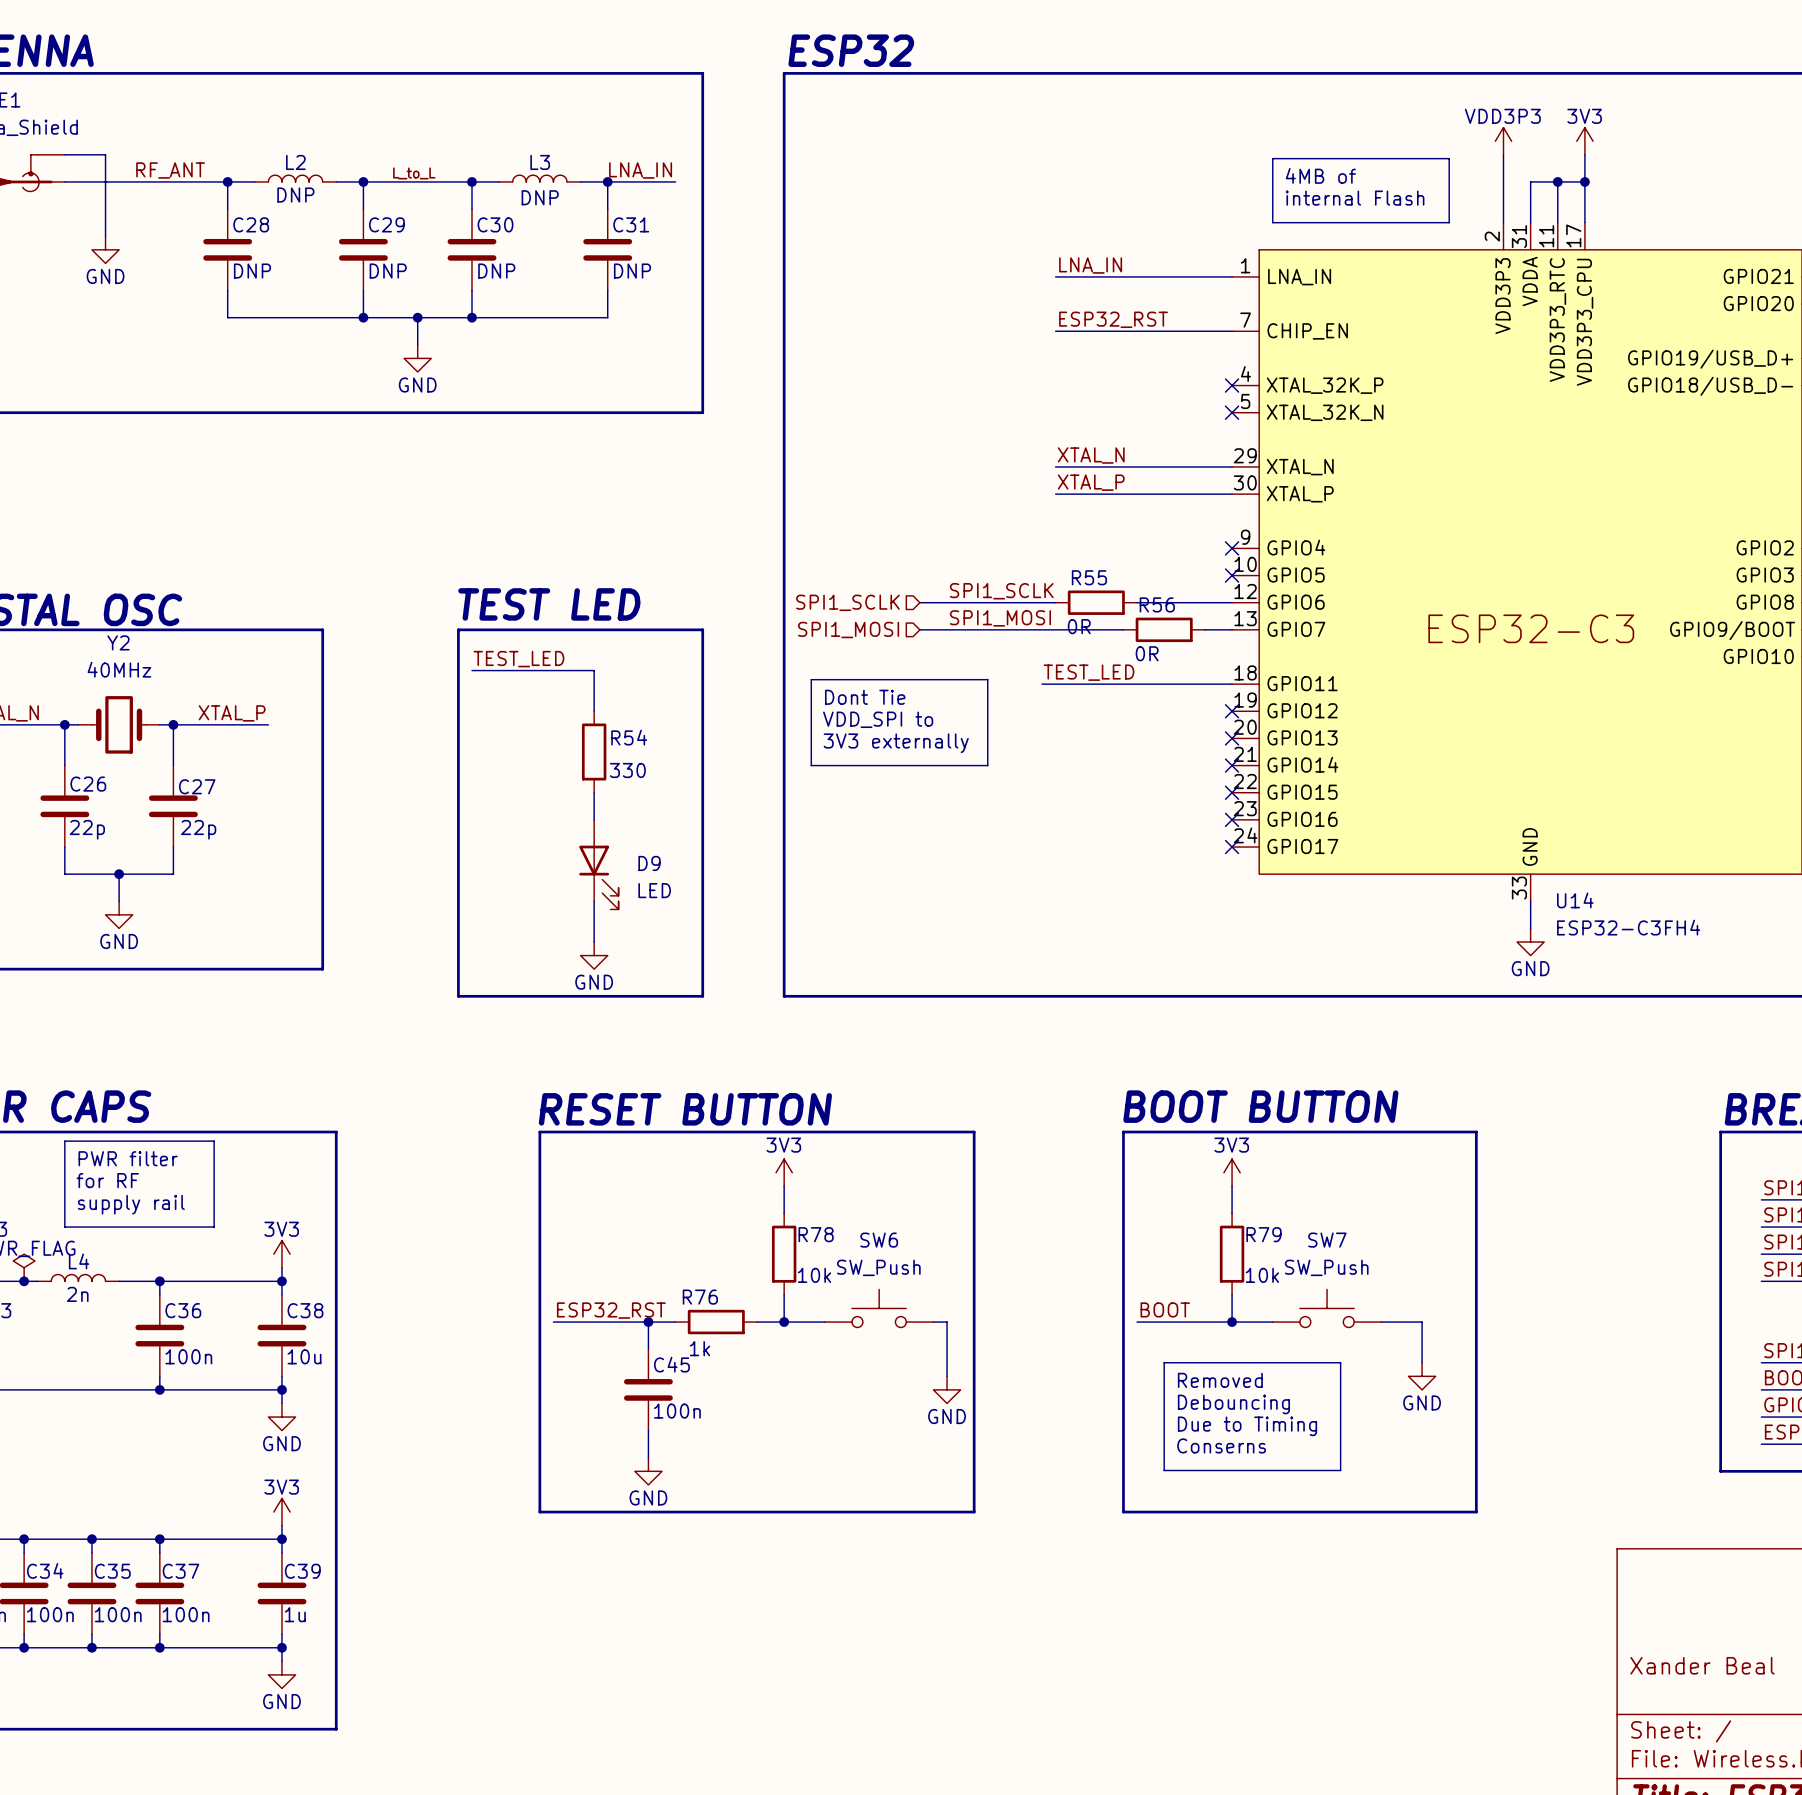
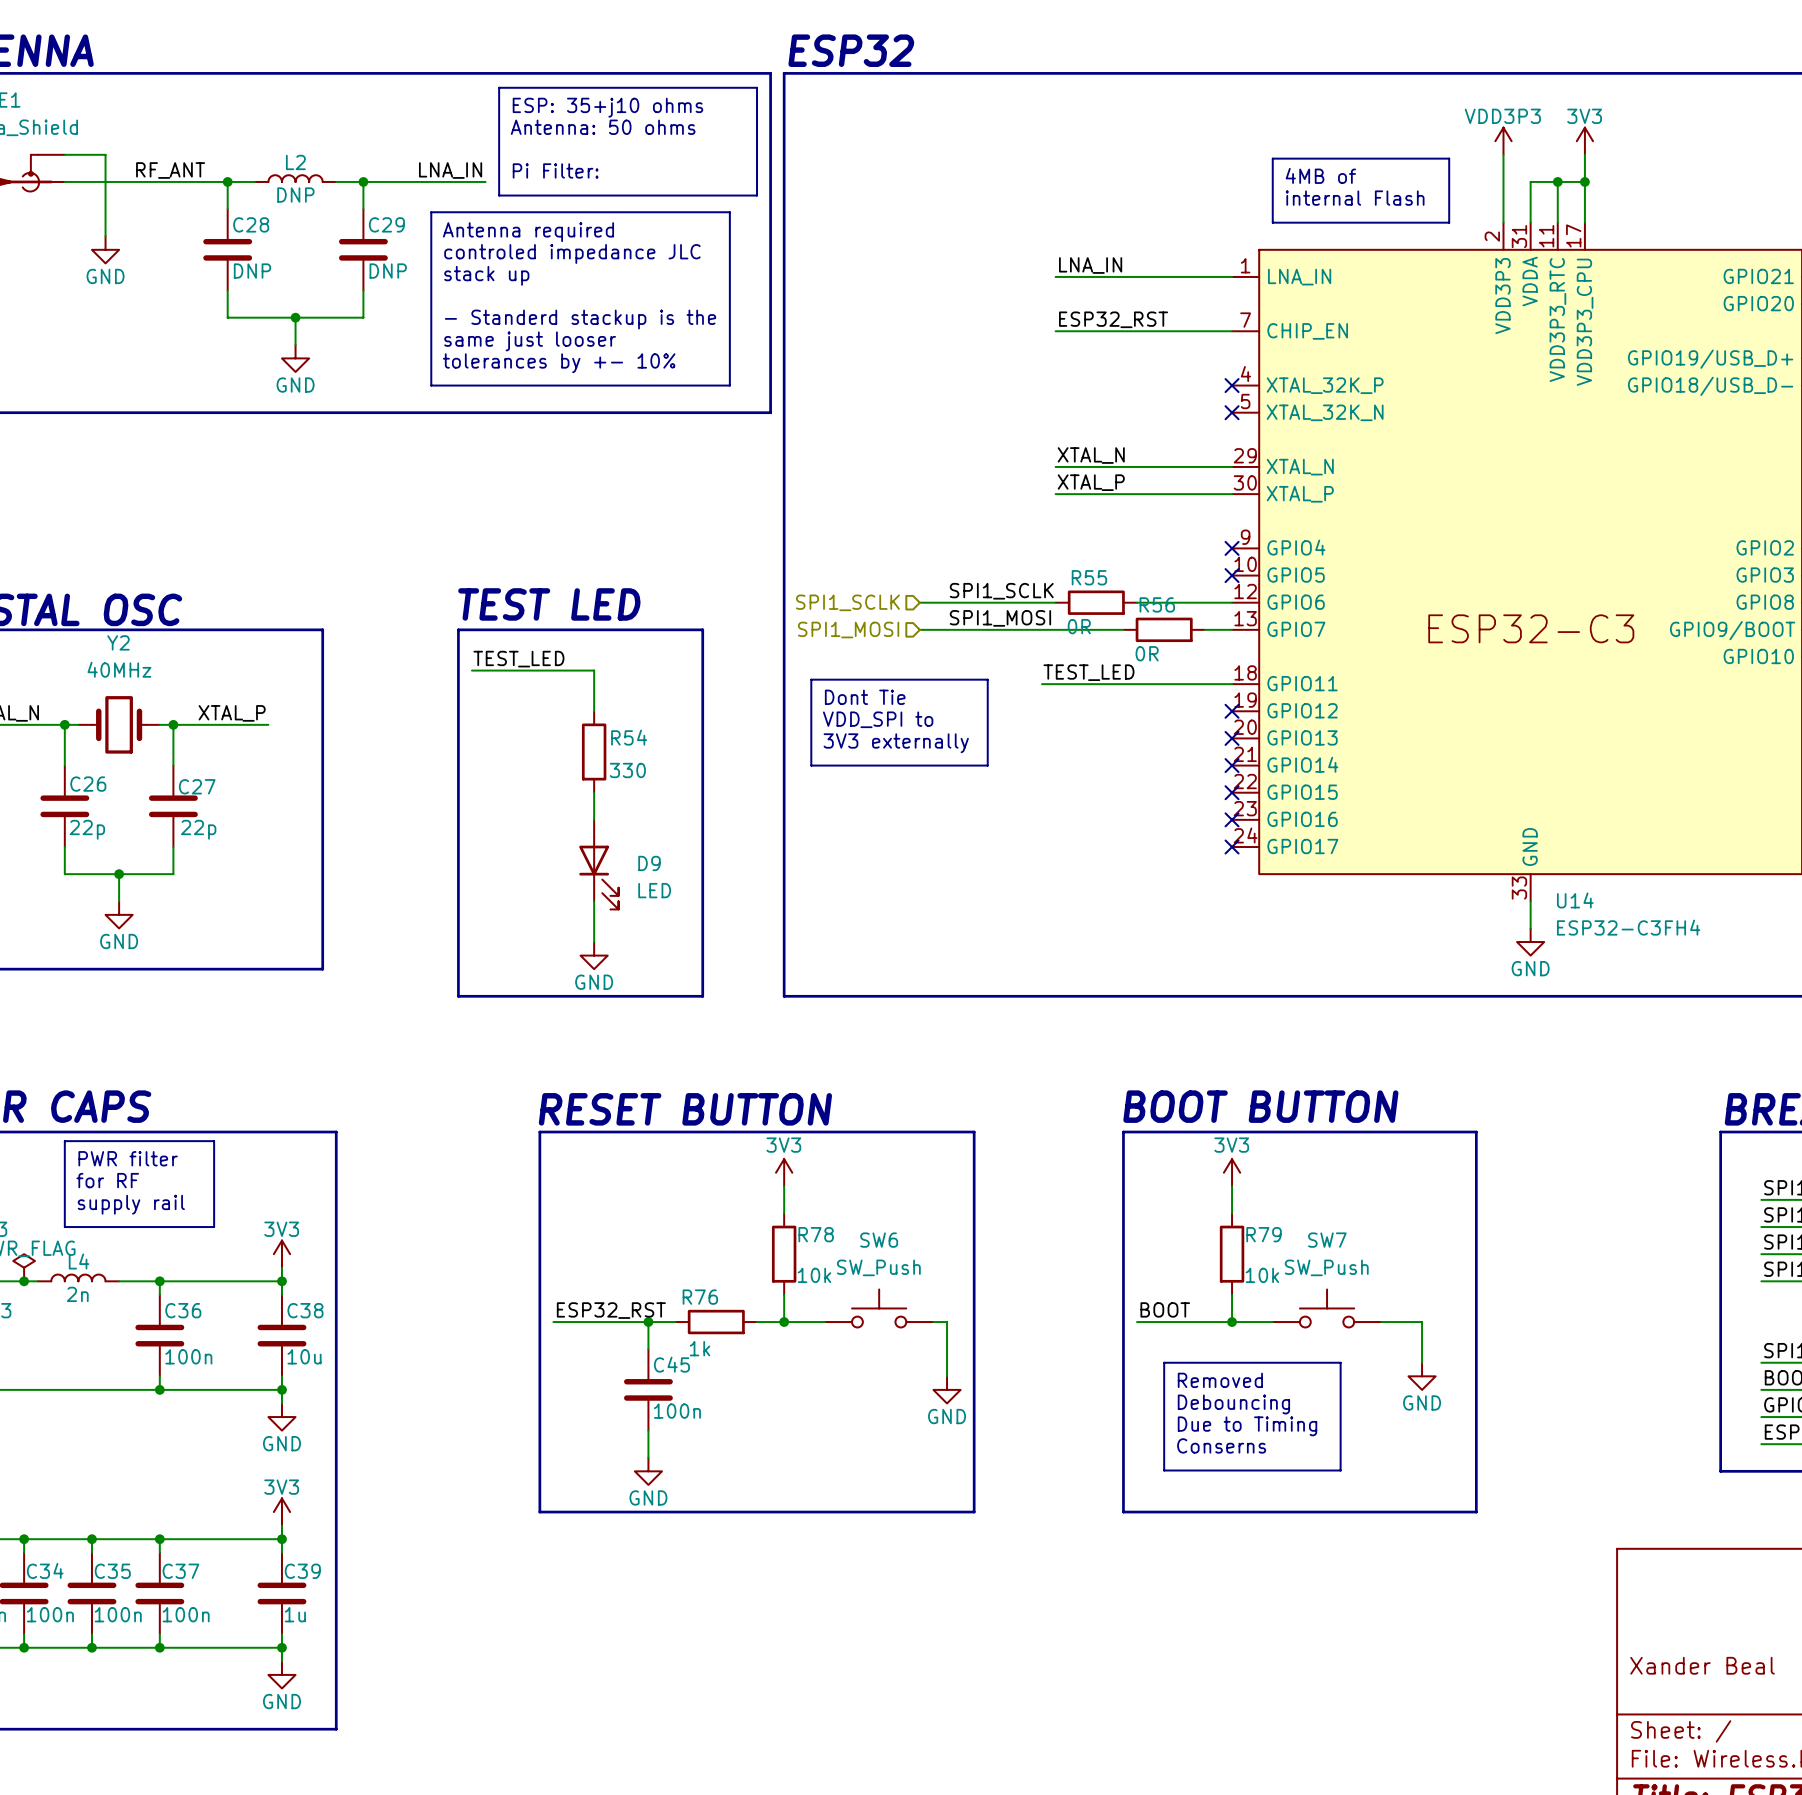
line: (702, 73) (702, 412) -> (702, 73) (770, 73) (770, 412) (702, 412)
line: none -> (499, 87) (757, 87) (757, 195) (499, 195) (499, 87)
text: none -> ESP: 35+j10 ohms (607, 107)
text: none -> Antenna: 50 ohms (603, 127)
text: none -> Pi Filter: (555, 170)
label position: LNA_IN (640, 170) -> LNA_IN (450, 170)
label: L_to_L (414, 173) -> none
L3: DNP (539, 178) -> none
wire: (471, 181) (471, 209) -> none
junction: (471, 181) -> none
wire: (485, 181) (499, 181) -> none
wire: (580, 181) (675, 181) -> none
wire: (607, 181) (607, 209) -> none
junction: (607, 181) -> none
line: none -> (431, 212) (729, 212) (729, 385) (431, 385) (431, 212)
text: none -> Antenna required (528, 232)
C30: DNP (471, 249) -> none
C31: DNP (607, 249) -> none
text: none -> controled impedance JLC (572, 253)
text: none -> stack up (486, 275)
wire: (471, 290) (471, 317) -> none
wire: (607, 290) (607, 317) (363, 317) -> none
junction: none -> (295, 317)
junction: (363, 317) -> none
wire: (417, 317) (417, 344) -> (295, 317) (295, 344)
junction: (417, 317) -> none
junction: (471, 317) -> none
text: none -> - Standerd stackup is the (580, 319)
text: none -> same just looser (530, 341)
power symbol position: GND (417, 358) -> GND (295, 358)
text: none -> tolerances by +- 10% (559, 363)

